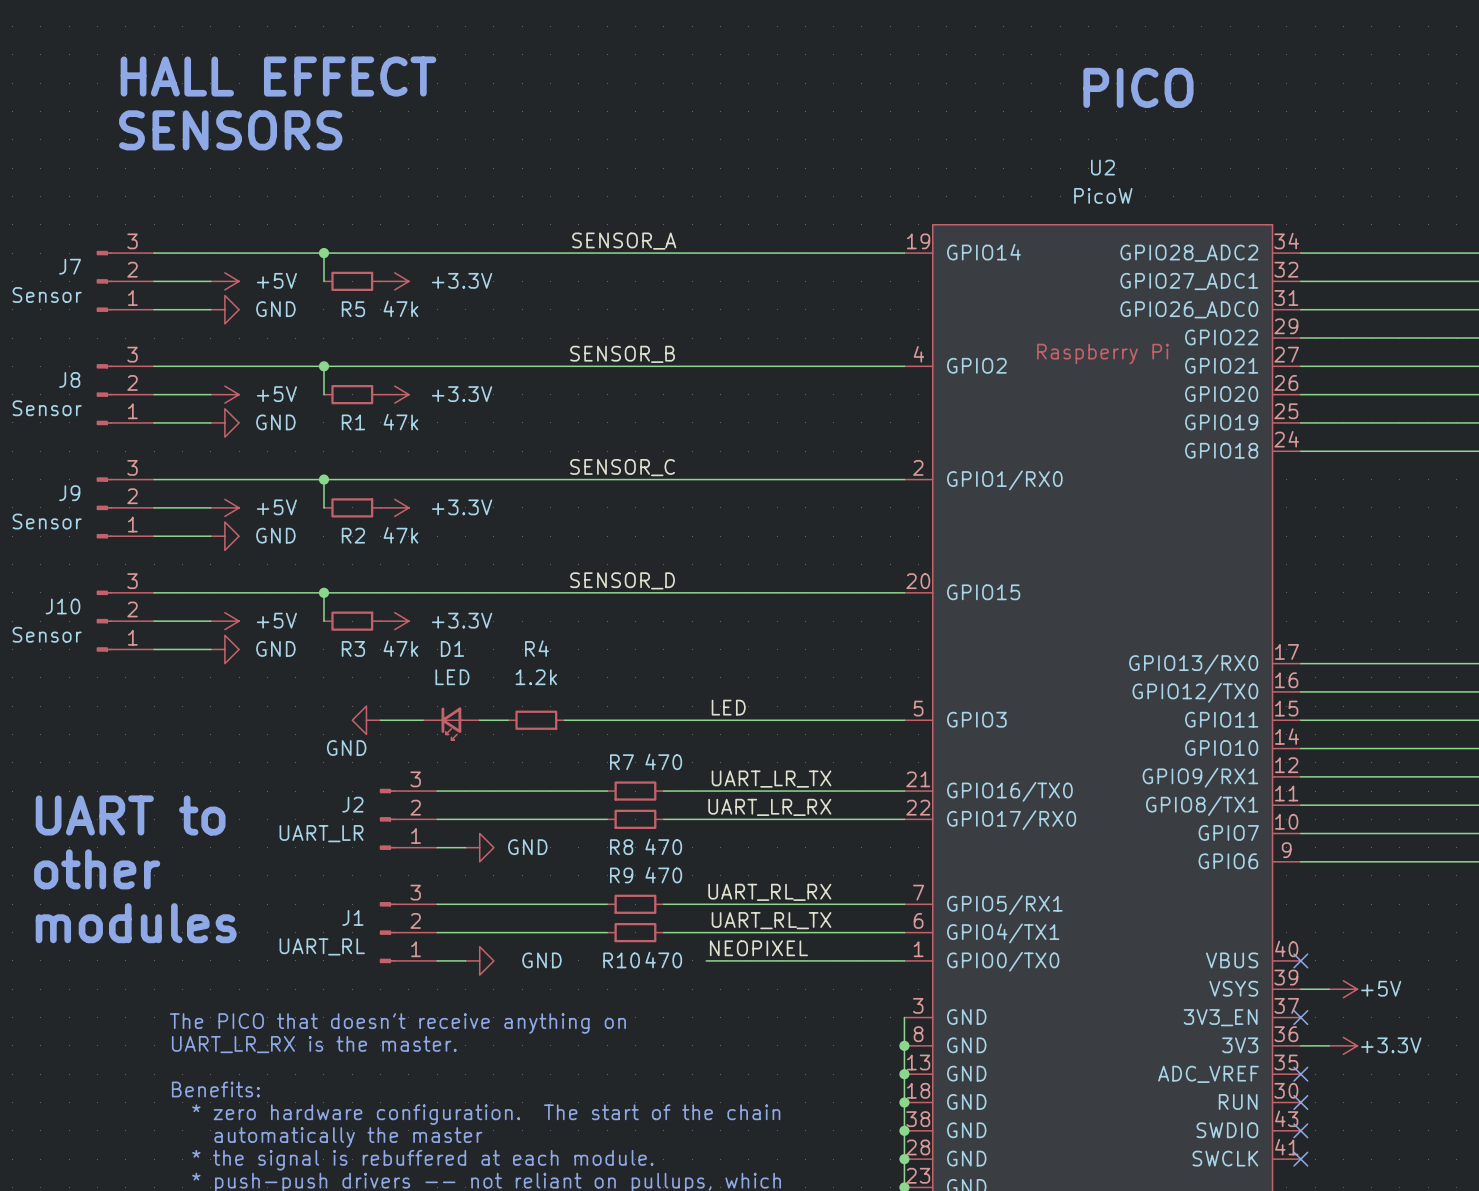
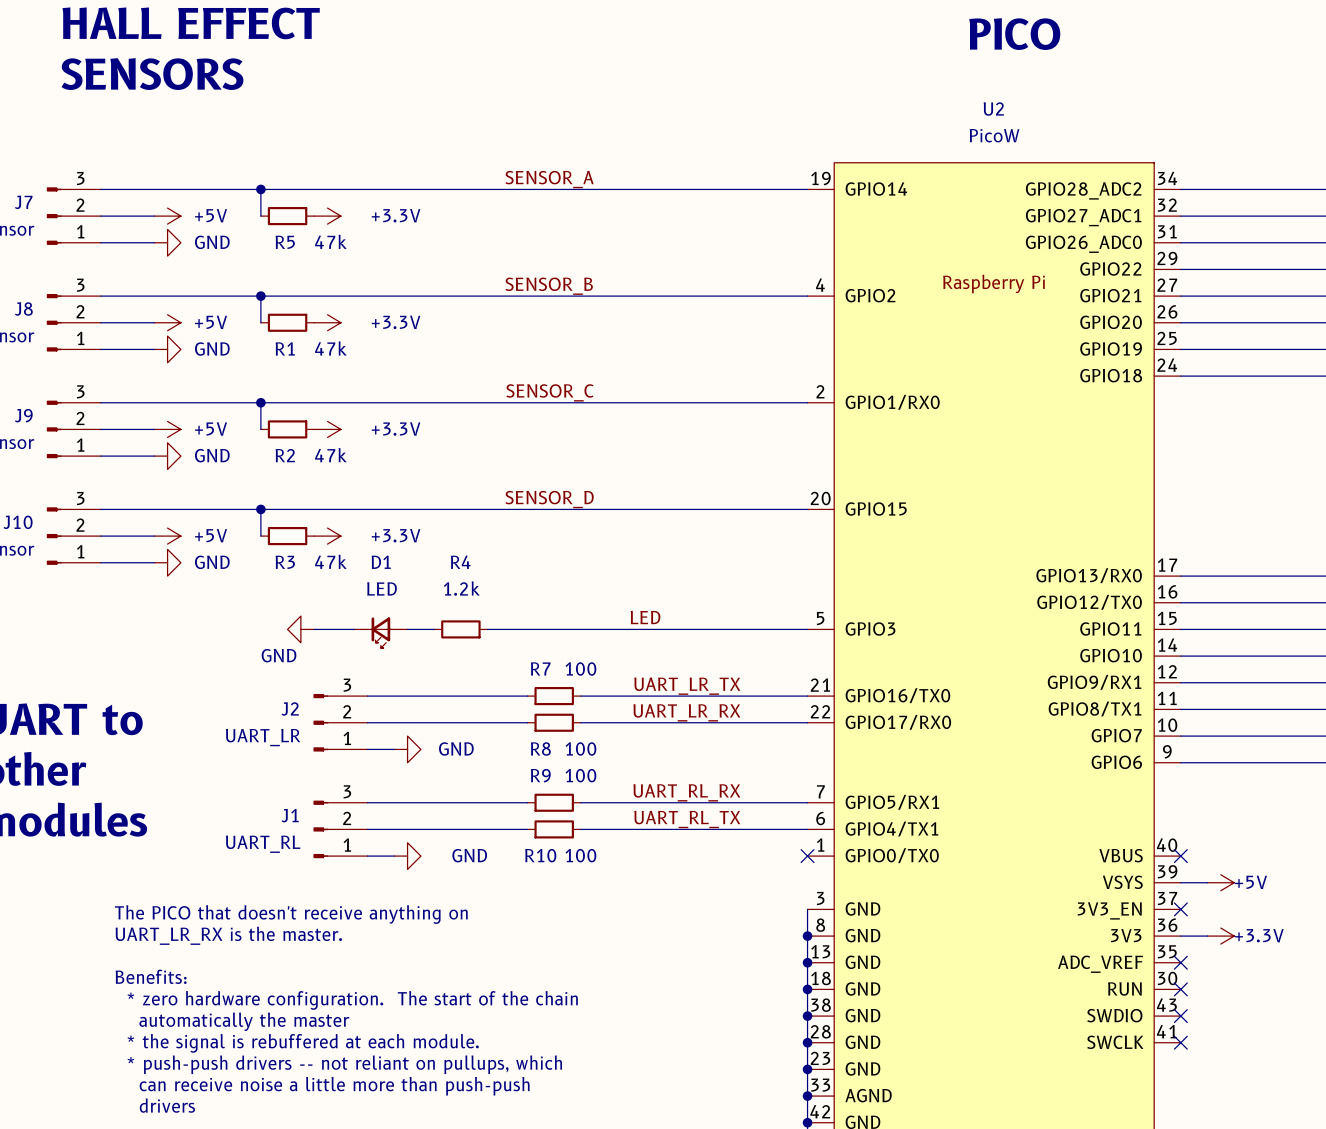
R7 value: 470 (663, 761) -> 100 (580, 668)
R8 value: 470 (663, 846) -> 100 (580, 748)
R9 value: 470 (663, 875) -> 100 (580, 775)
label: NEOPIXEL (758, 948) -> none
R10 value: 470 (663, 960) -> 100 (580, 855)
wire: (706, 960) (904, 960) -> none
no-connect mark: none -> (807, 856)

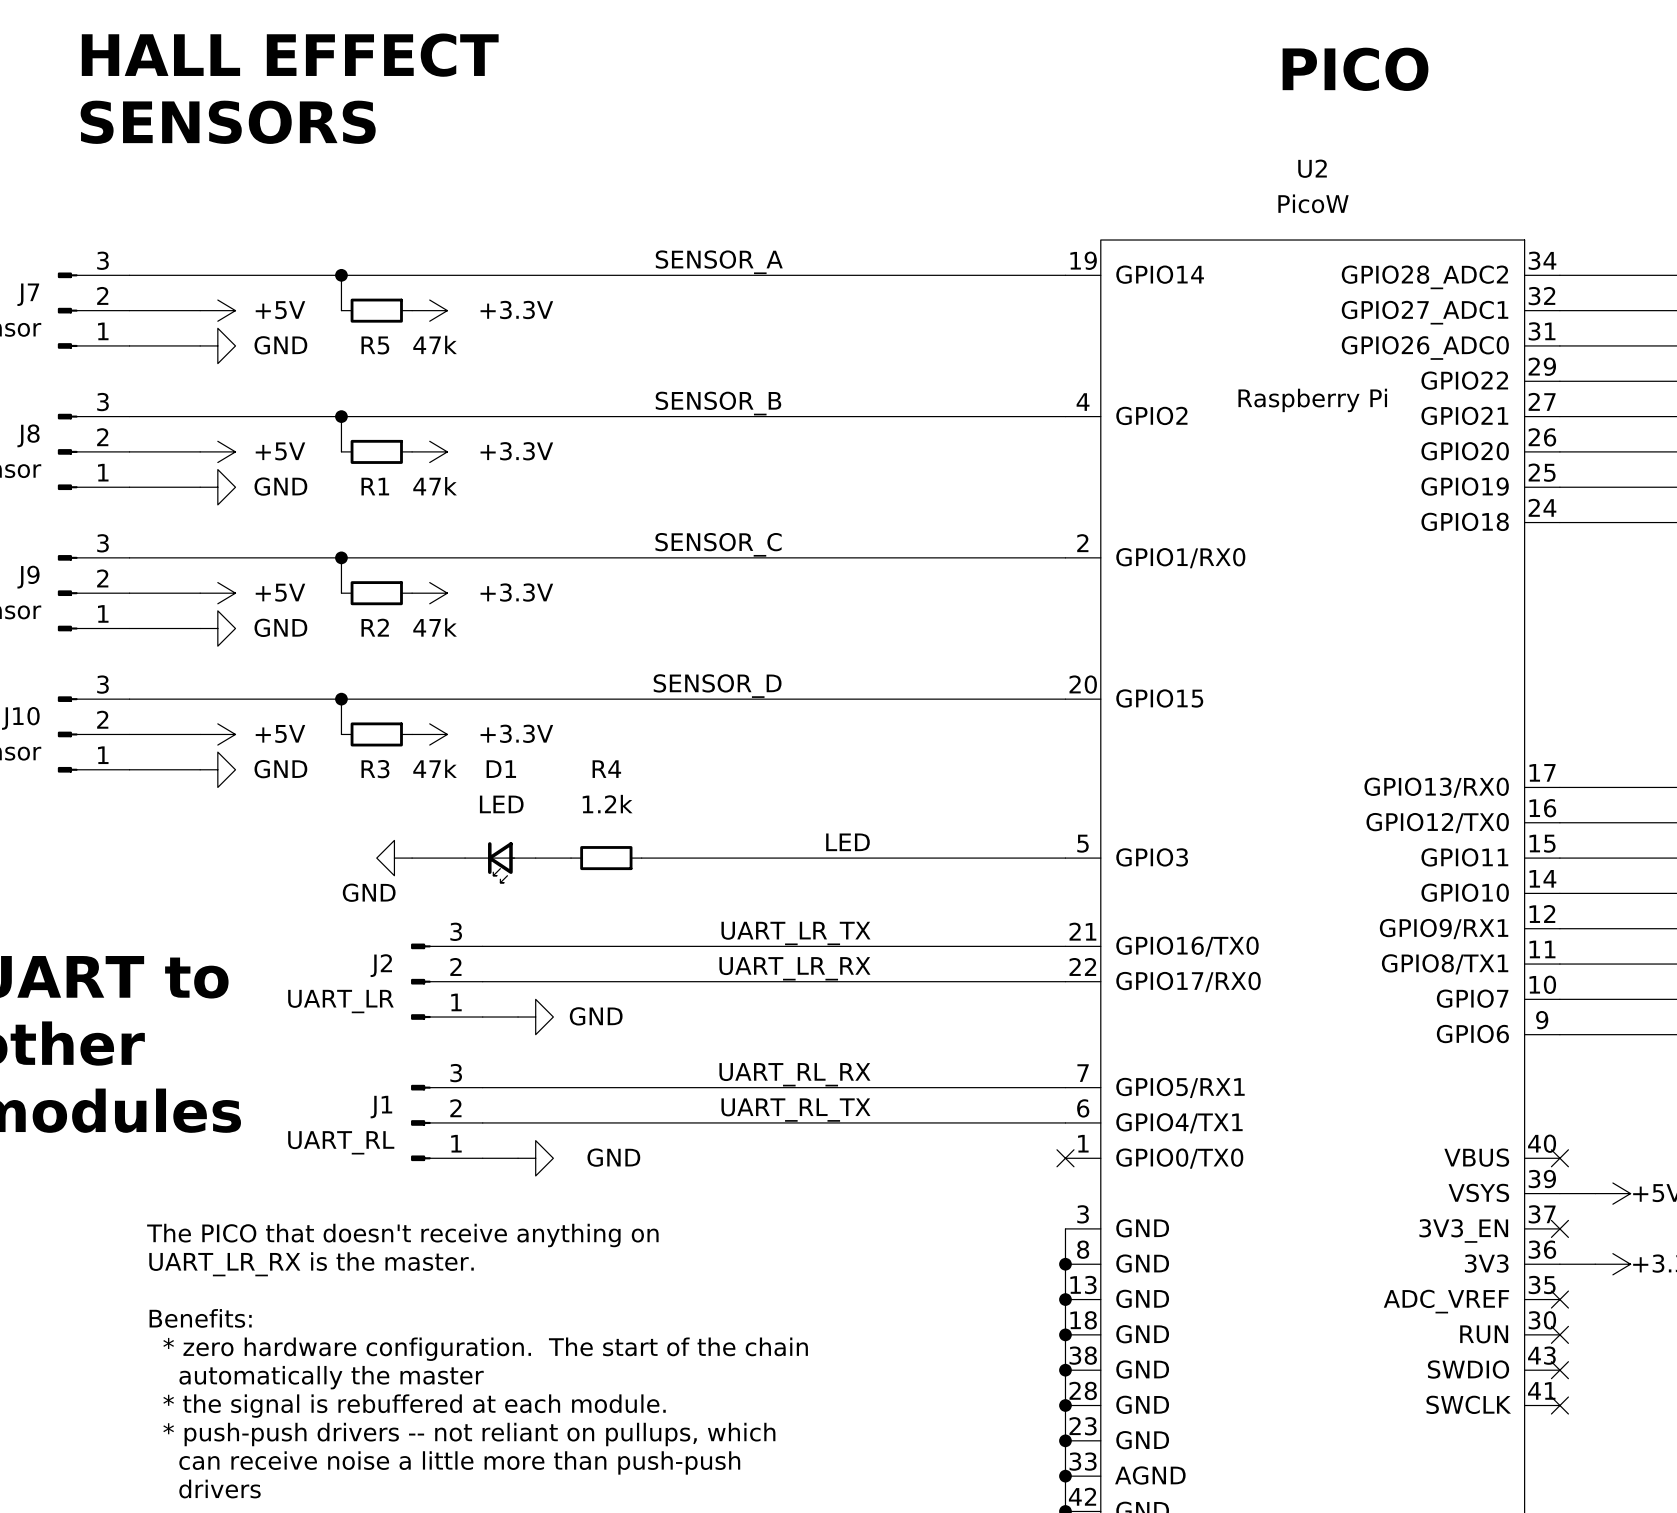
label position: UART_LR_TX (687, 686) -> UART_LR_TX (795, 933)
wire: none -> (694, 946) (765, 946)
R7: 100 (554, 696) -> none
label position: UART_LR_RX (686, 712) -> UART_LR_RX (794, 968)
wire: none -> (694, 981) (765, 981)
R8: 100 (554, 722) -> none
label position: UART_RL_RX (686, 792) -> UART_RL_RX (794, 1074)
wire: none -> (694, 1087) (765, 1087)
R9: 100 (554, 802) -> none
label position: UART_RL_TX (687, 819) -> UART_RL_TX (795, 1110)
wire: none -> (694, 1122) (765, 1122)
R10: 100 (554, 829) -> none

